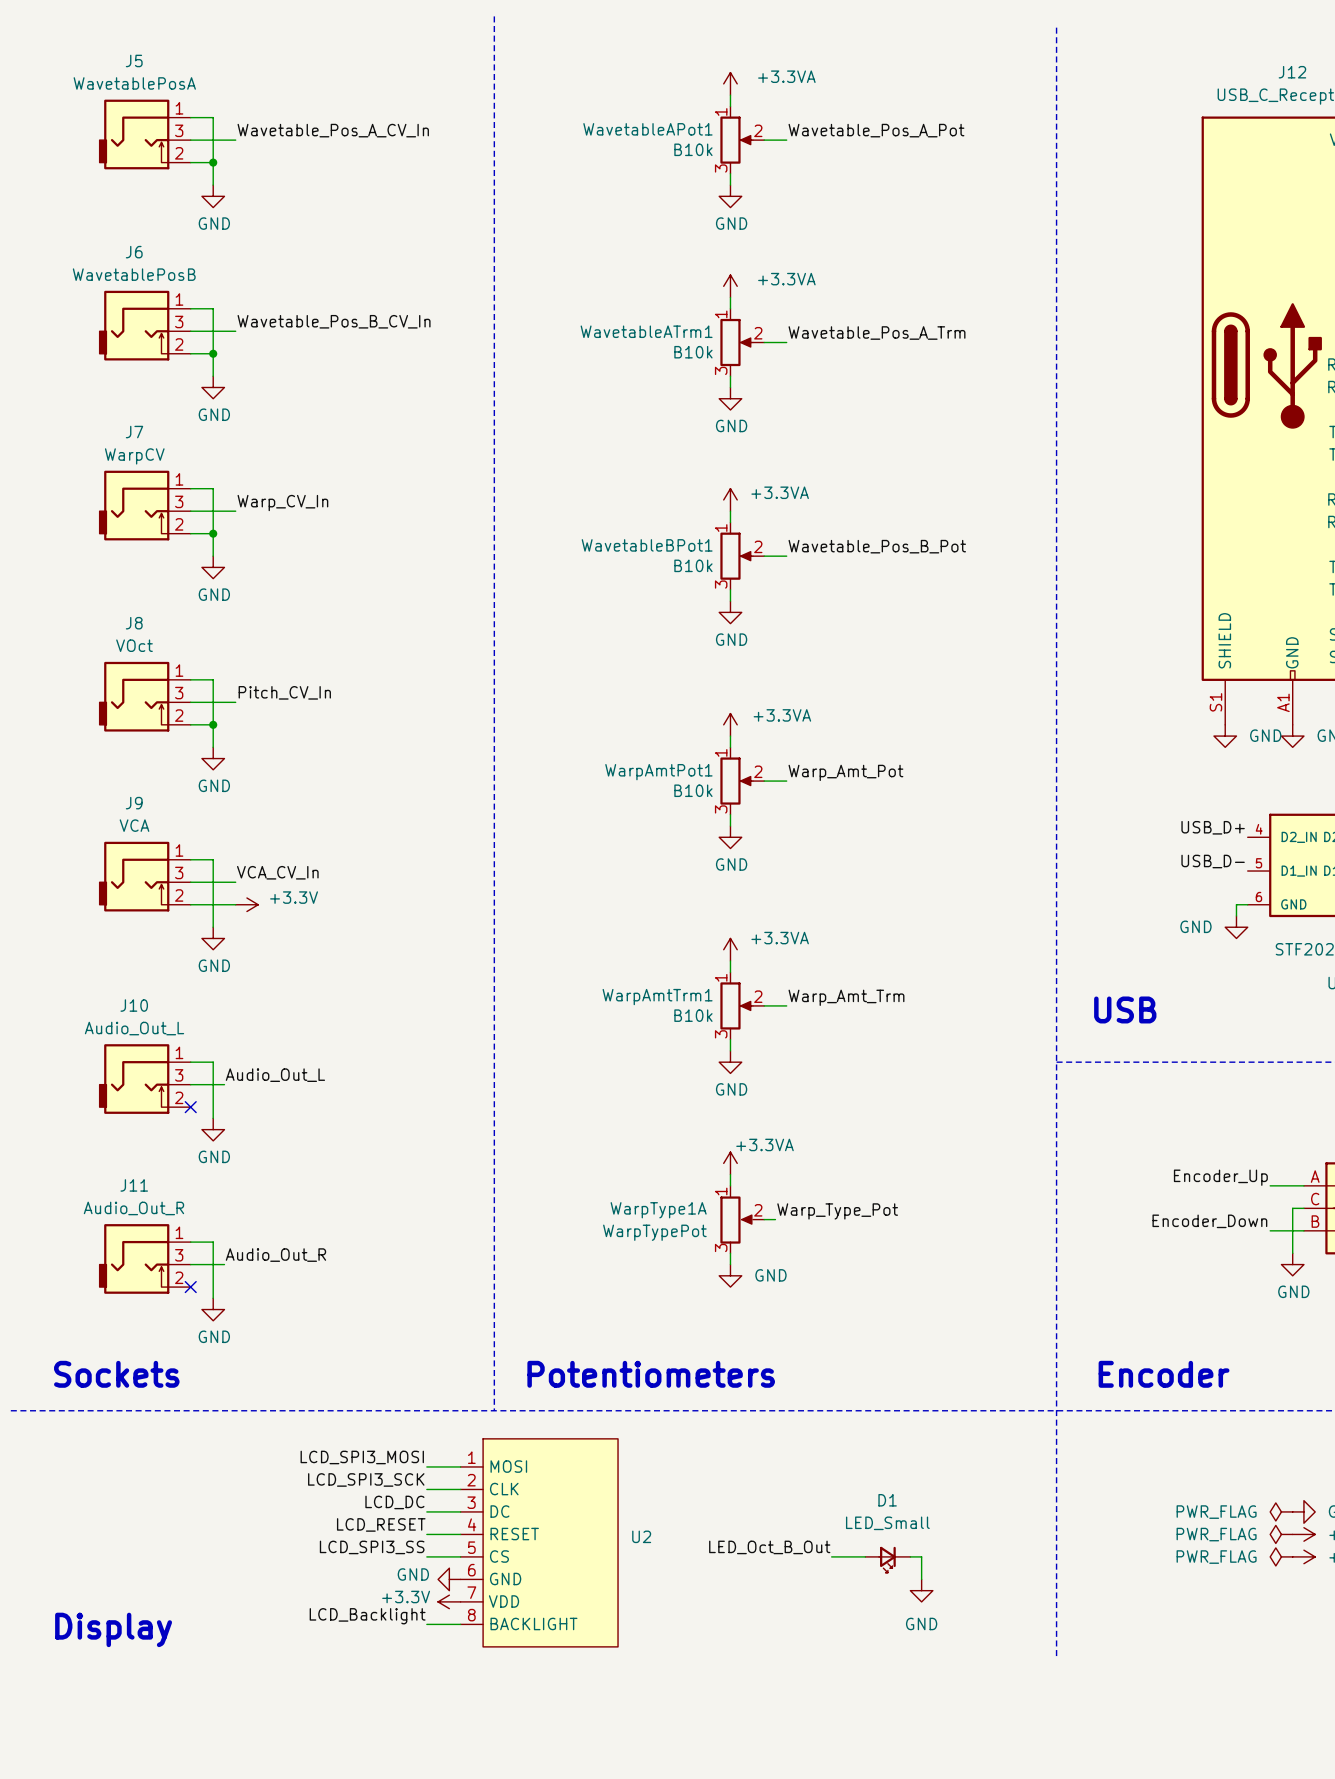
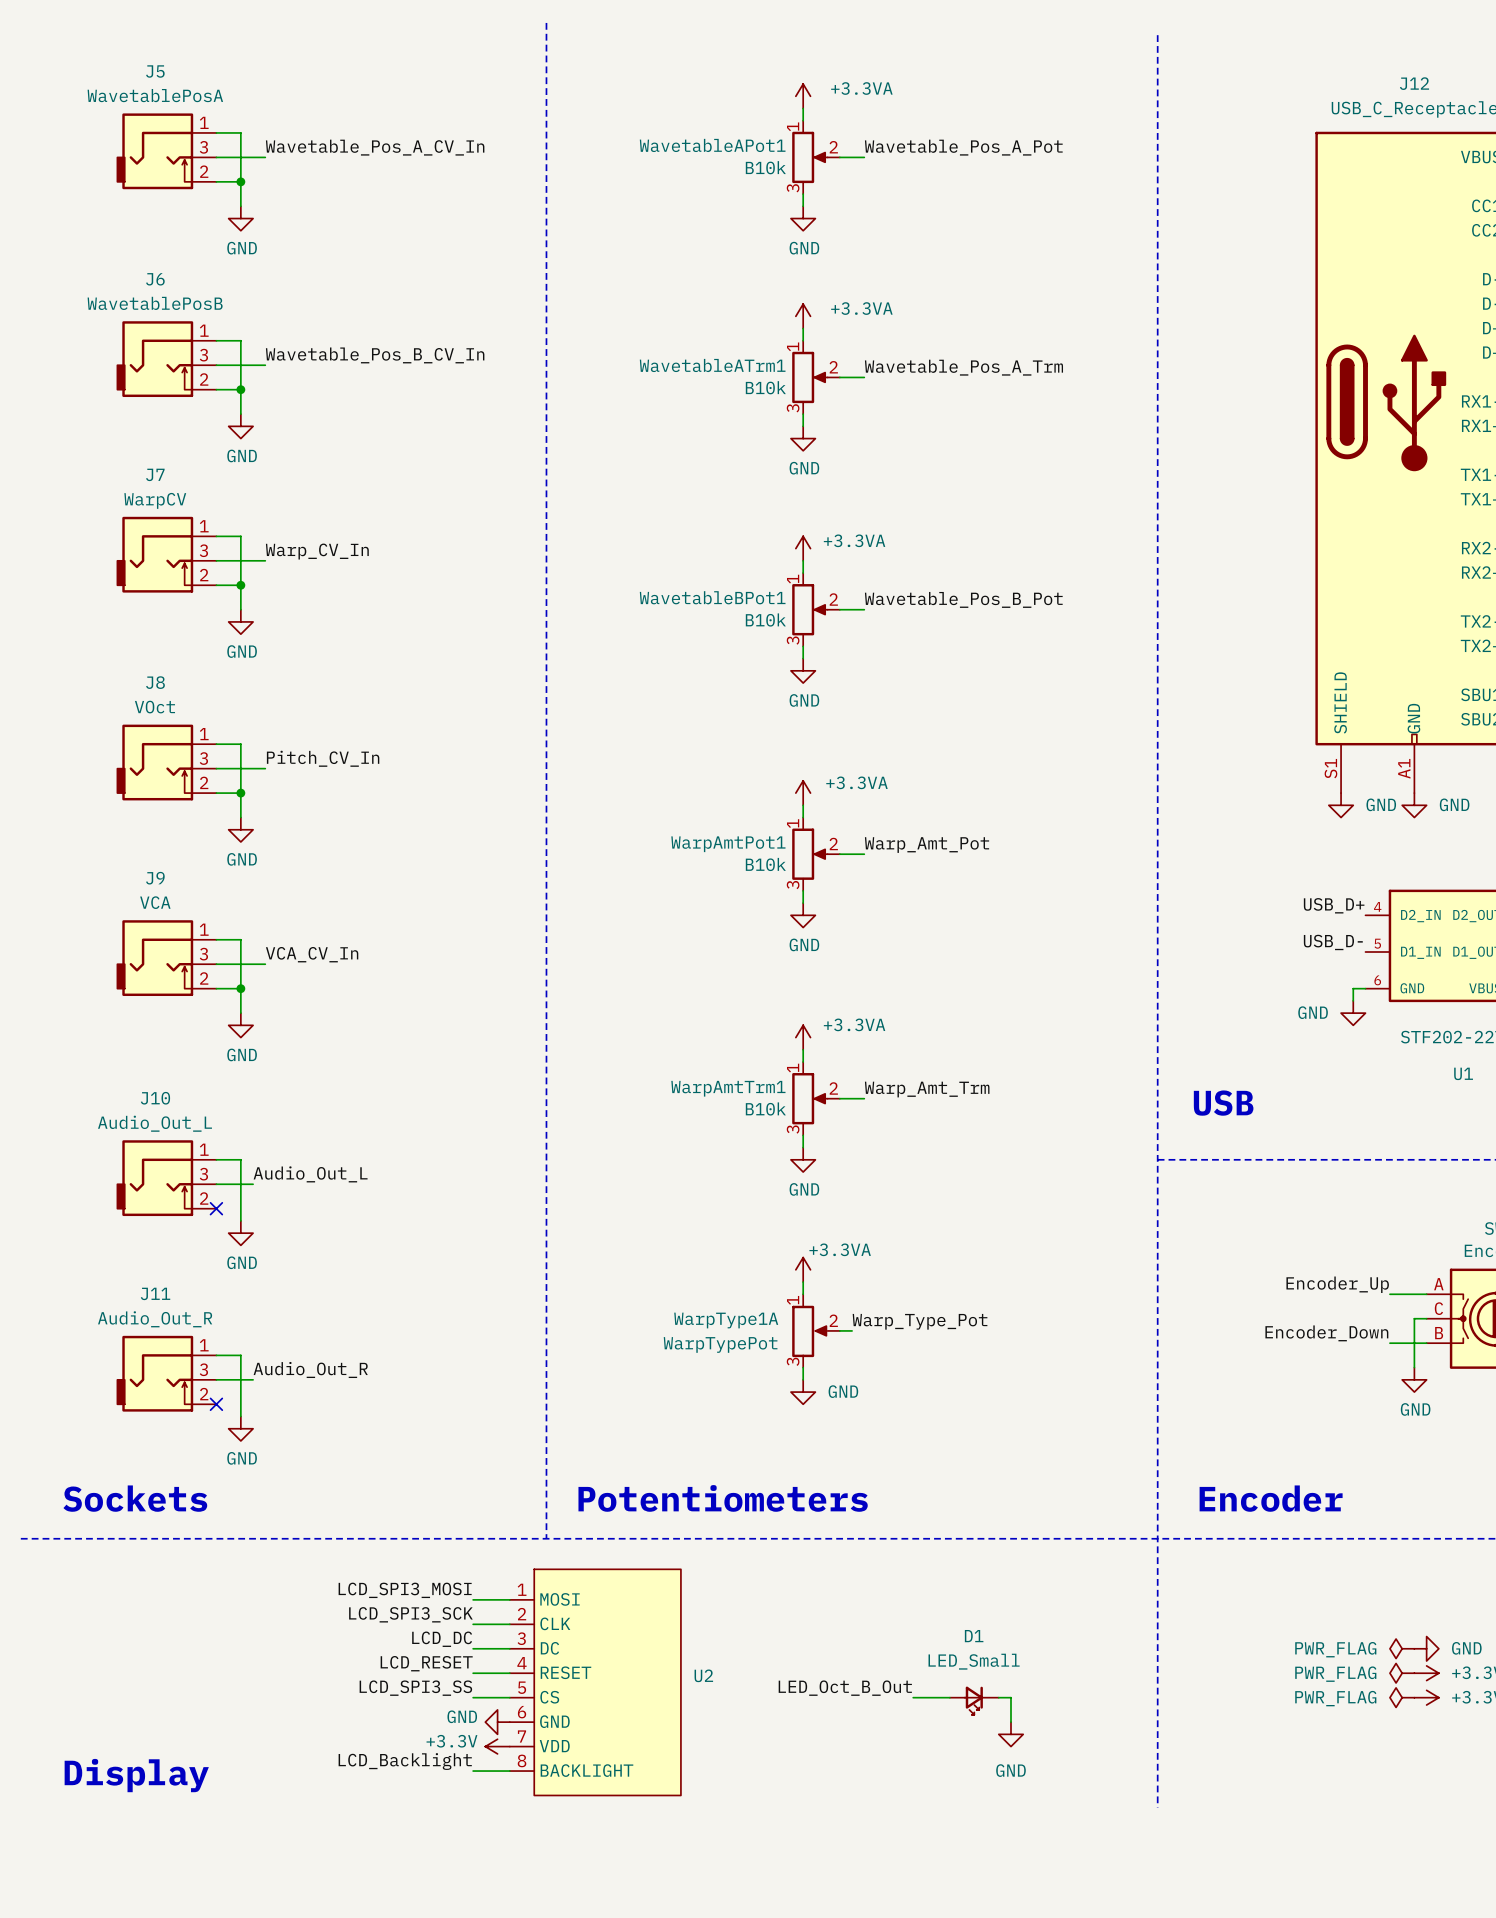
wire: (213, 904) (235, 904) -> none
junction: none -> (240, 988)
power symbol: +3.3V (246, 904) -> none

